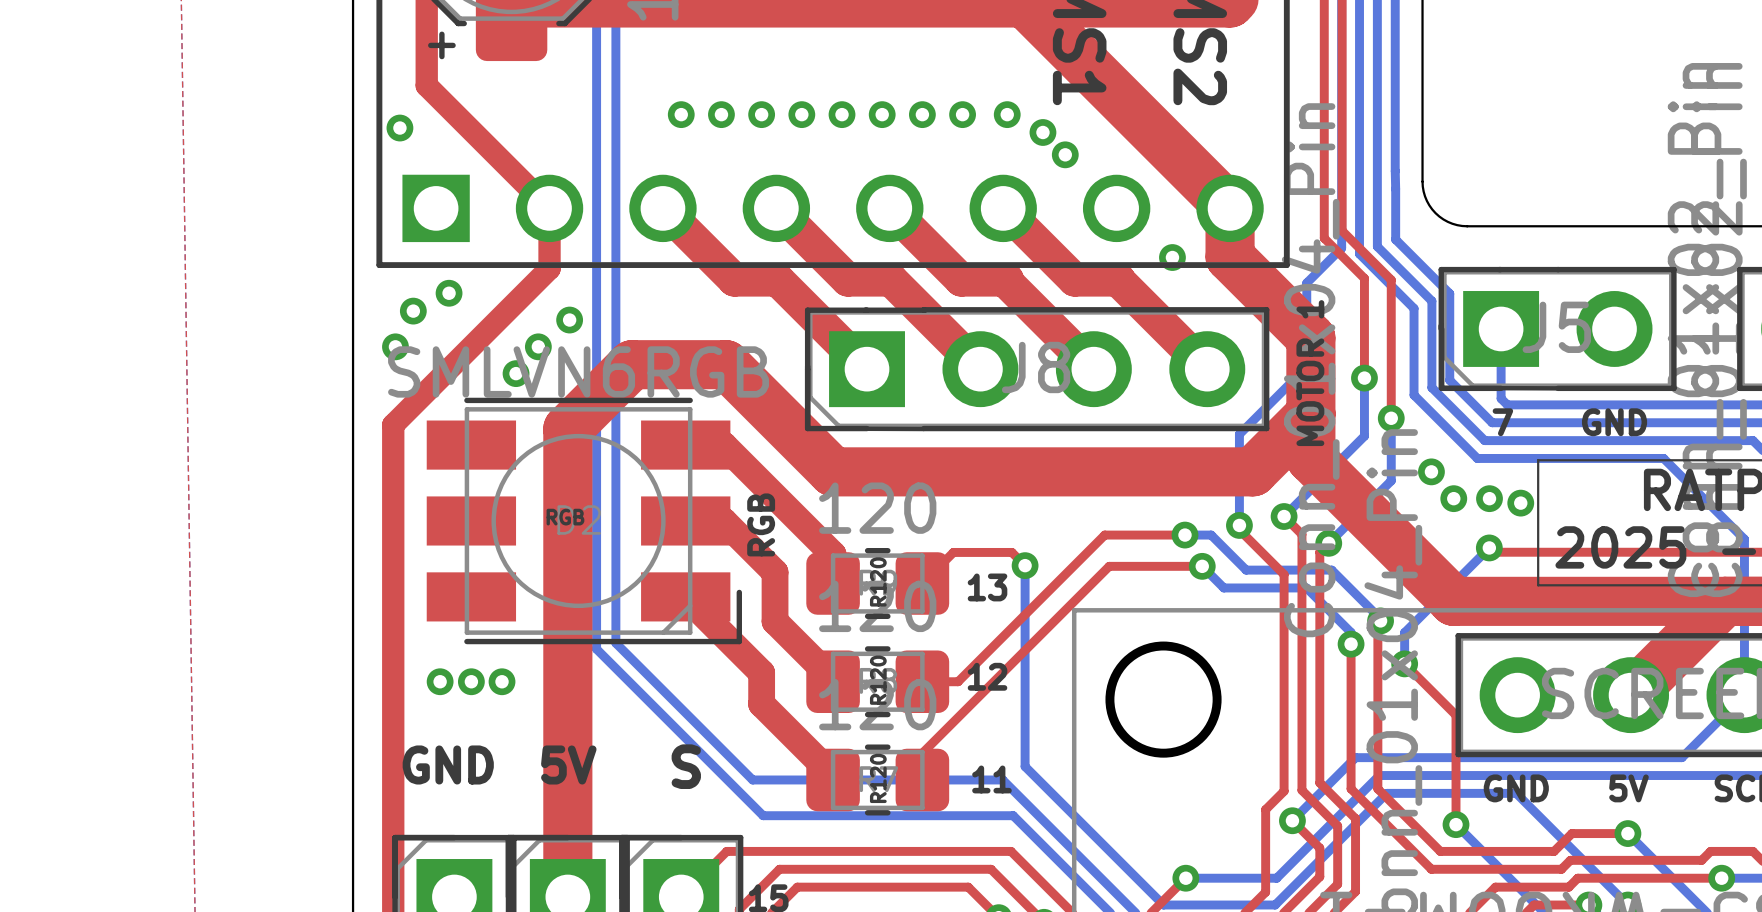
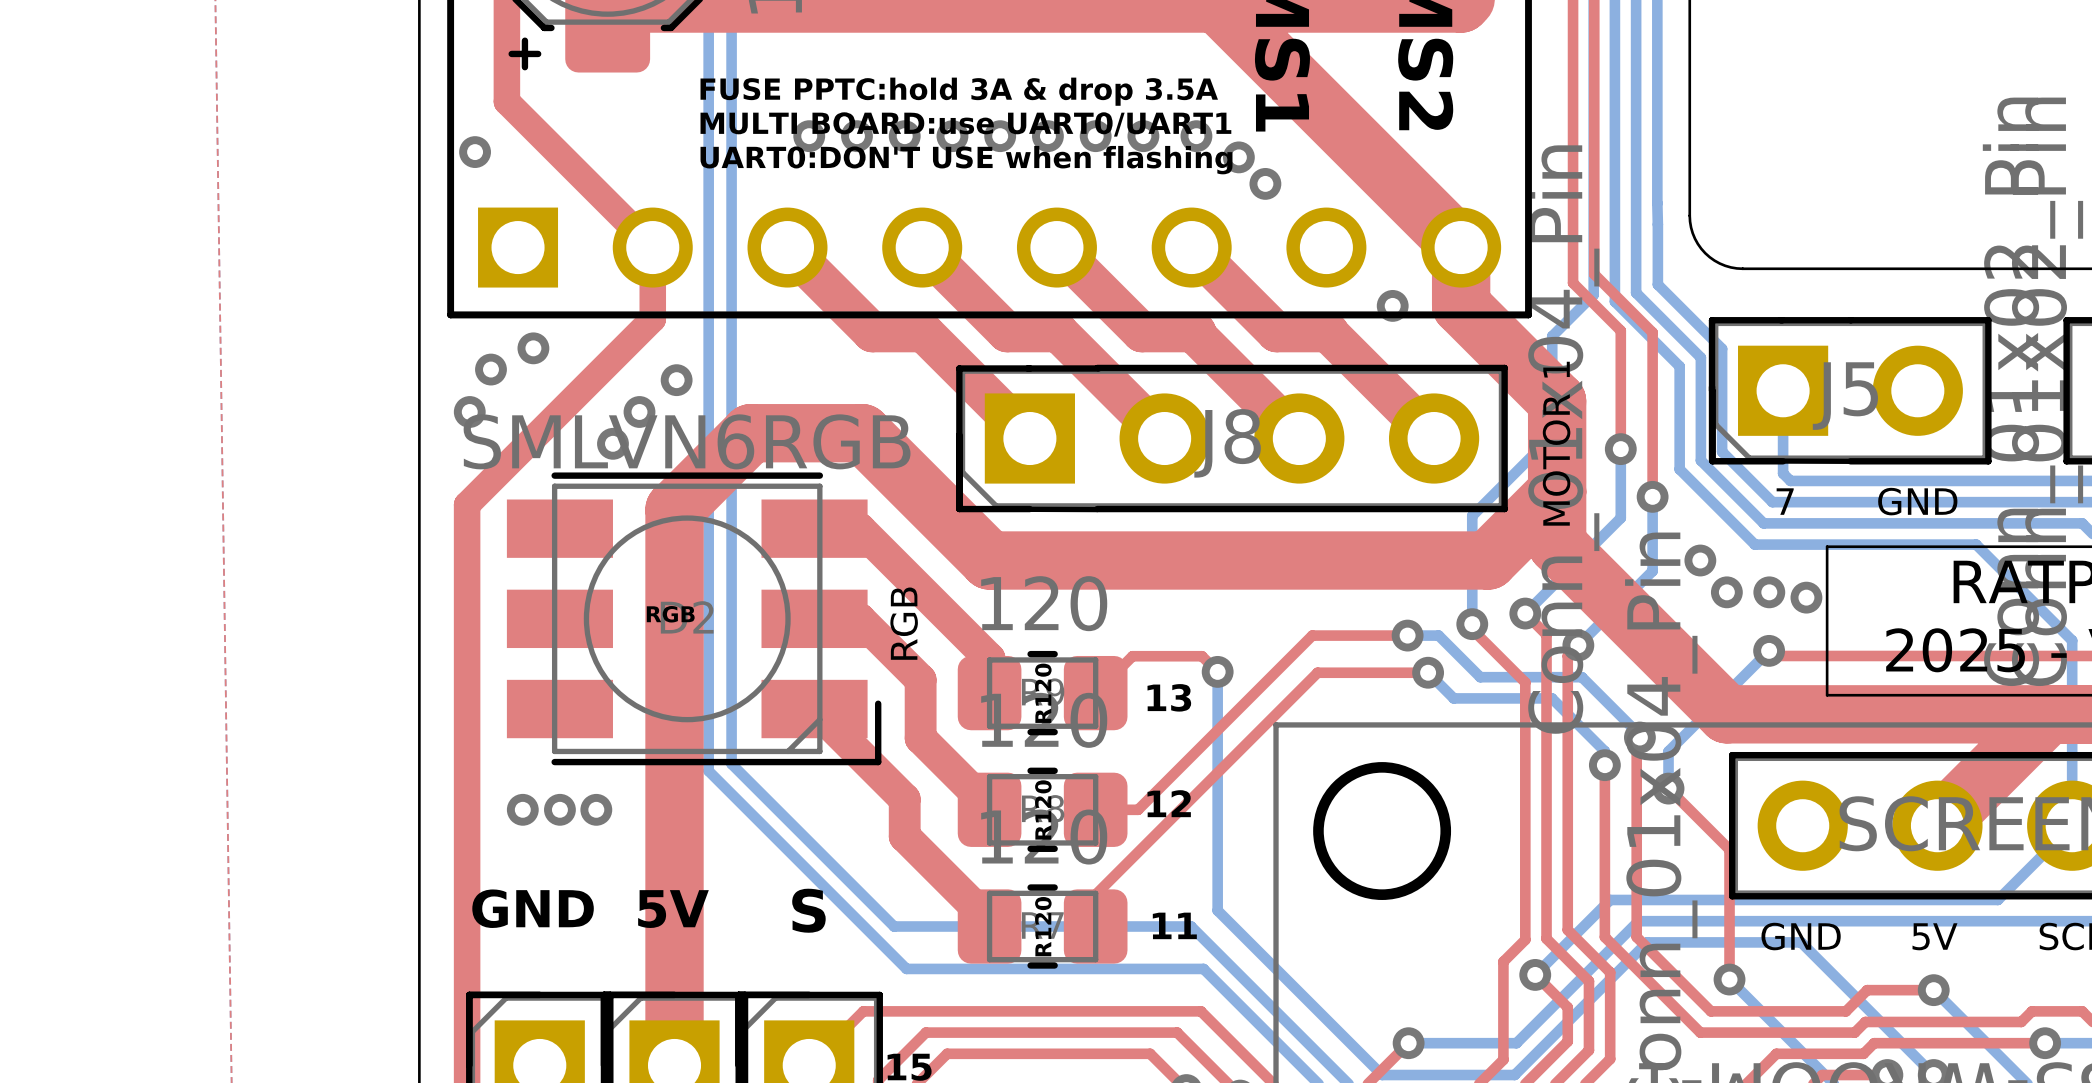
text: none -> FUSE PPTC:hold 3A & drop 3.5A (959, 91)
text: none -> MULTI BOARD:use UART0/UART1 (965, 124)
text: none -> UART0:DON'T USE when flashing (966, 160)

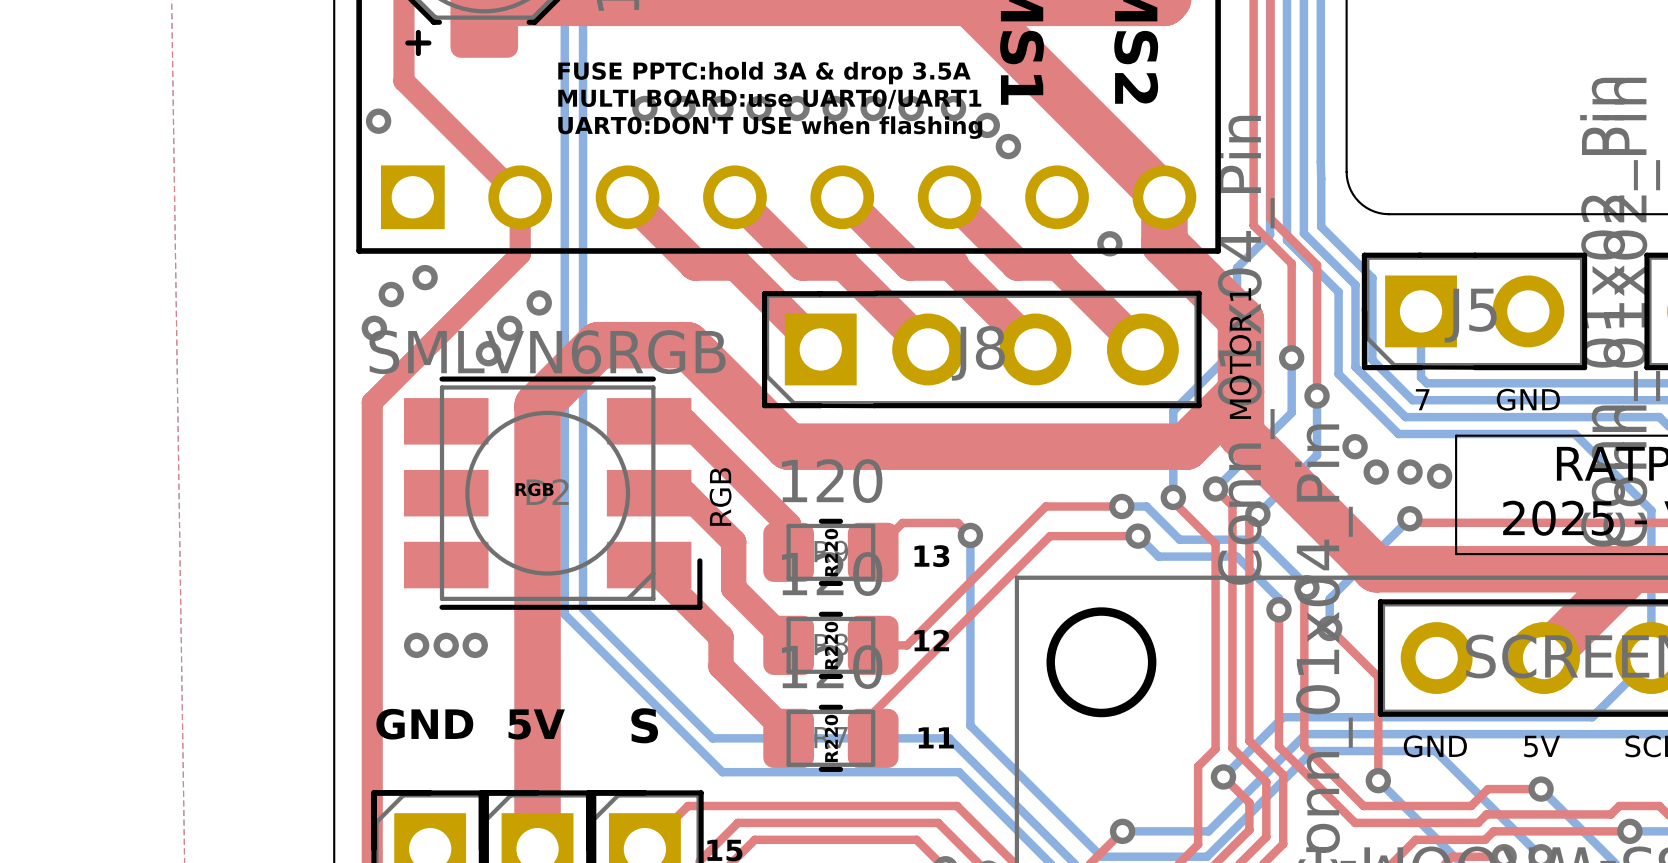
text: R120 (1043, 693) -> R220 (831, 552)
text: R120 (1043, 809) -> R220 (831, 645)
text: R120 (1043, 926) -> R220 (831, 738)

